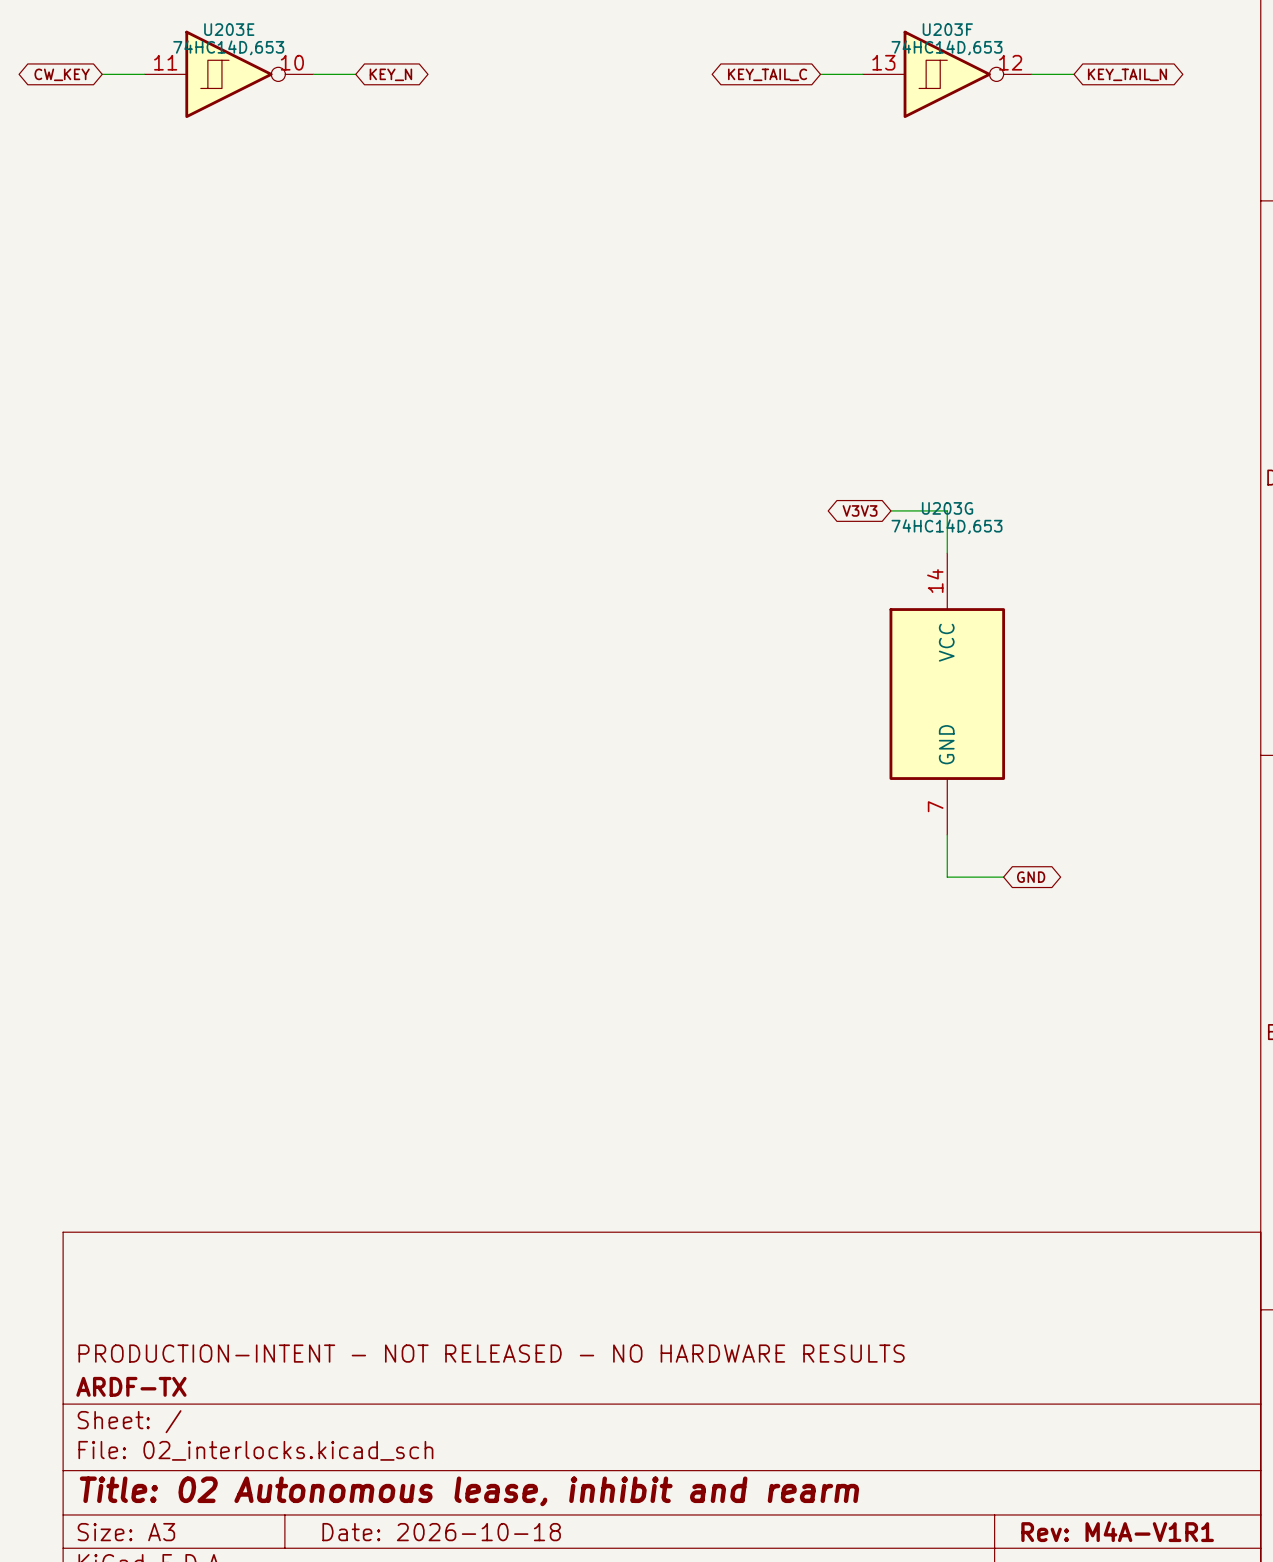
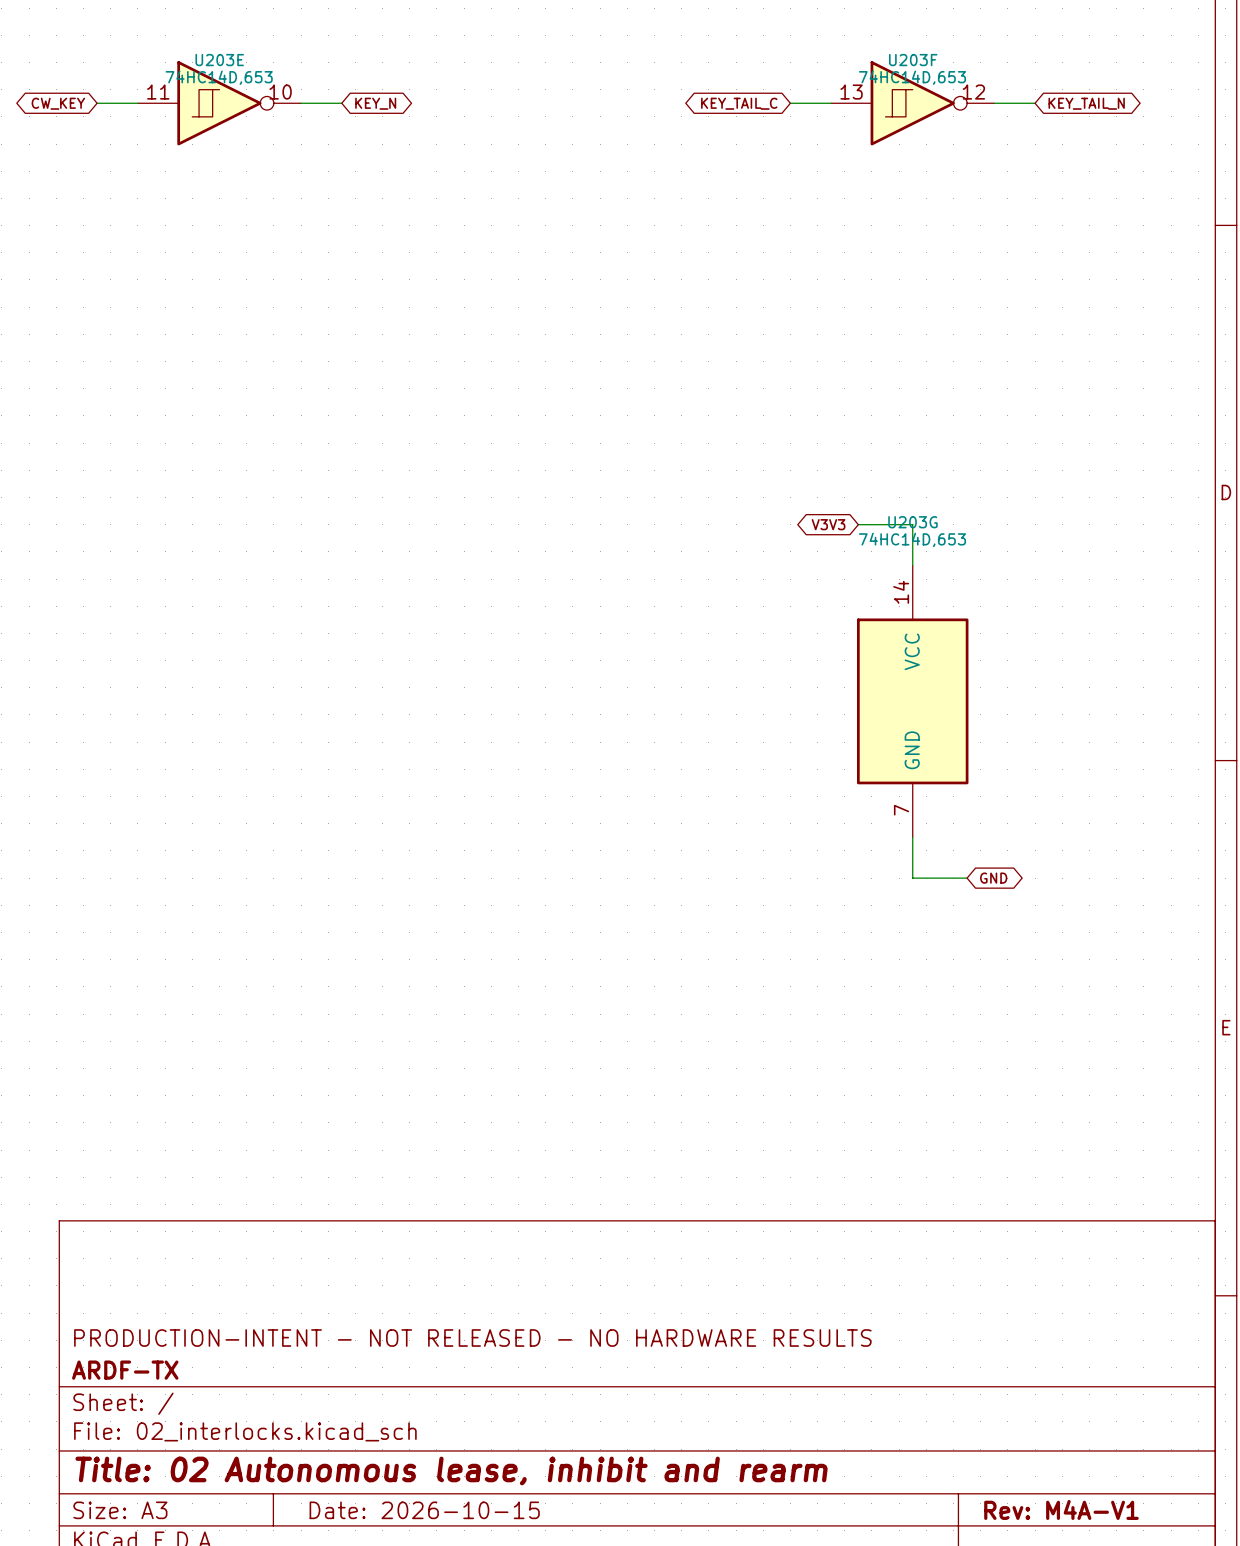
title block: Rev: M4A-V1R1 (1117, 1531) -> Rev: M4A-V1 (1061, 1509)
title block: Date: 2026-10-18 (441, 1532) -> Date: 2026-10-15 (424, 1510)

